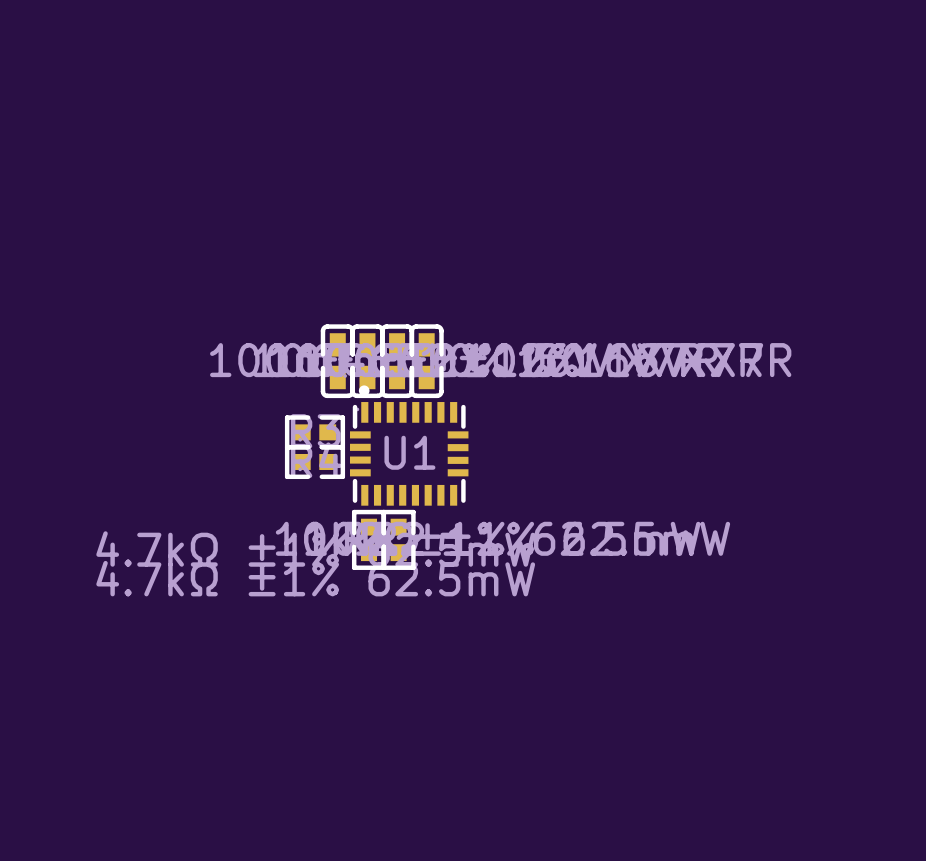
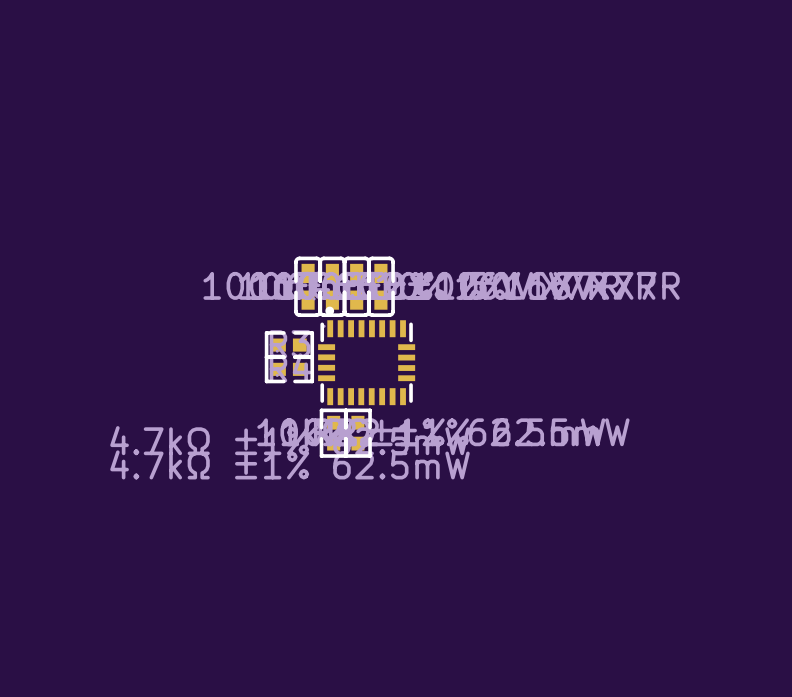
U1 name: U1 (409, 452) -> none

